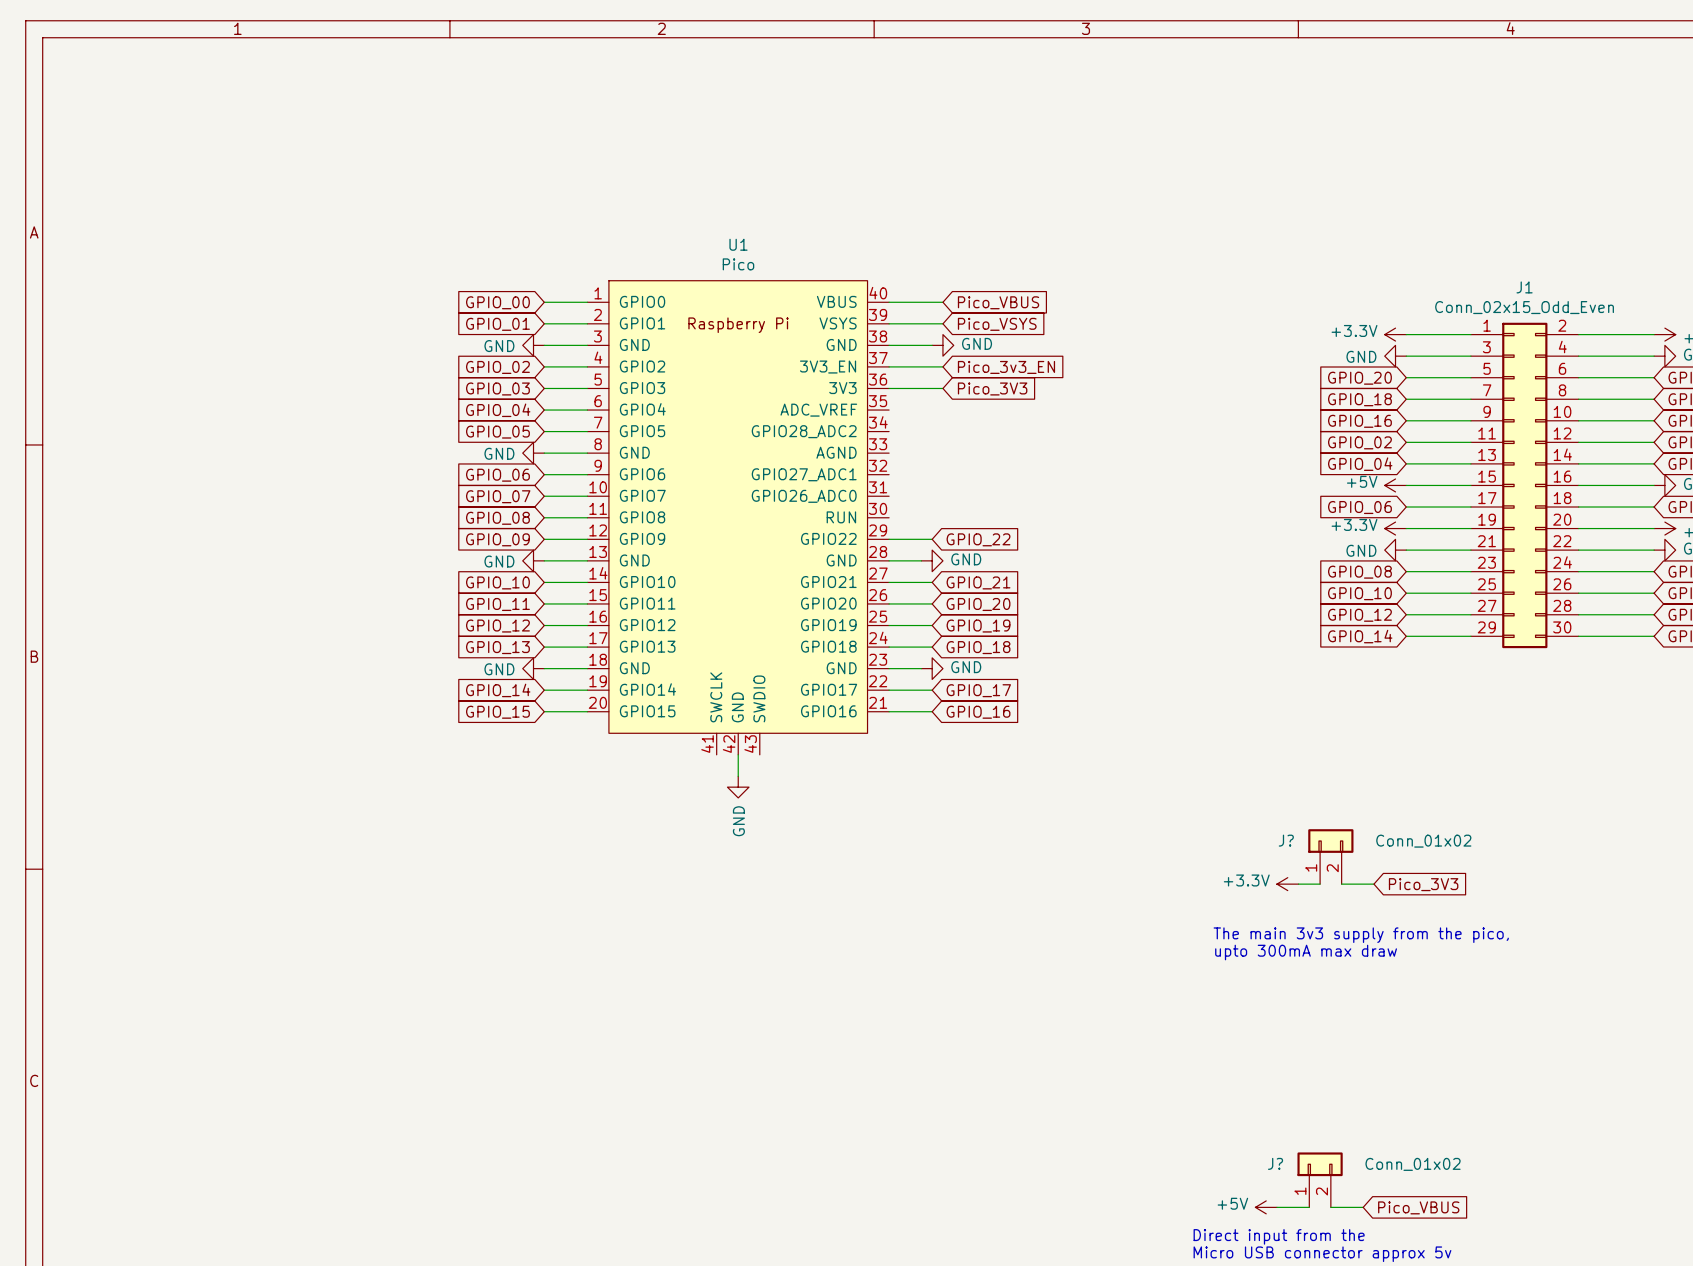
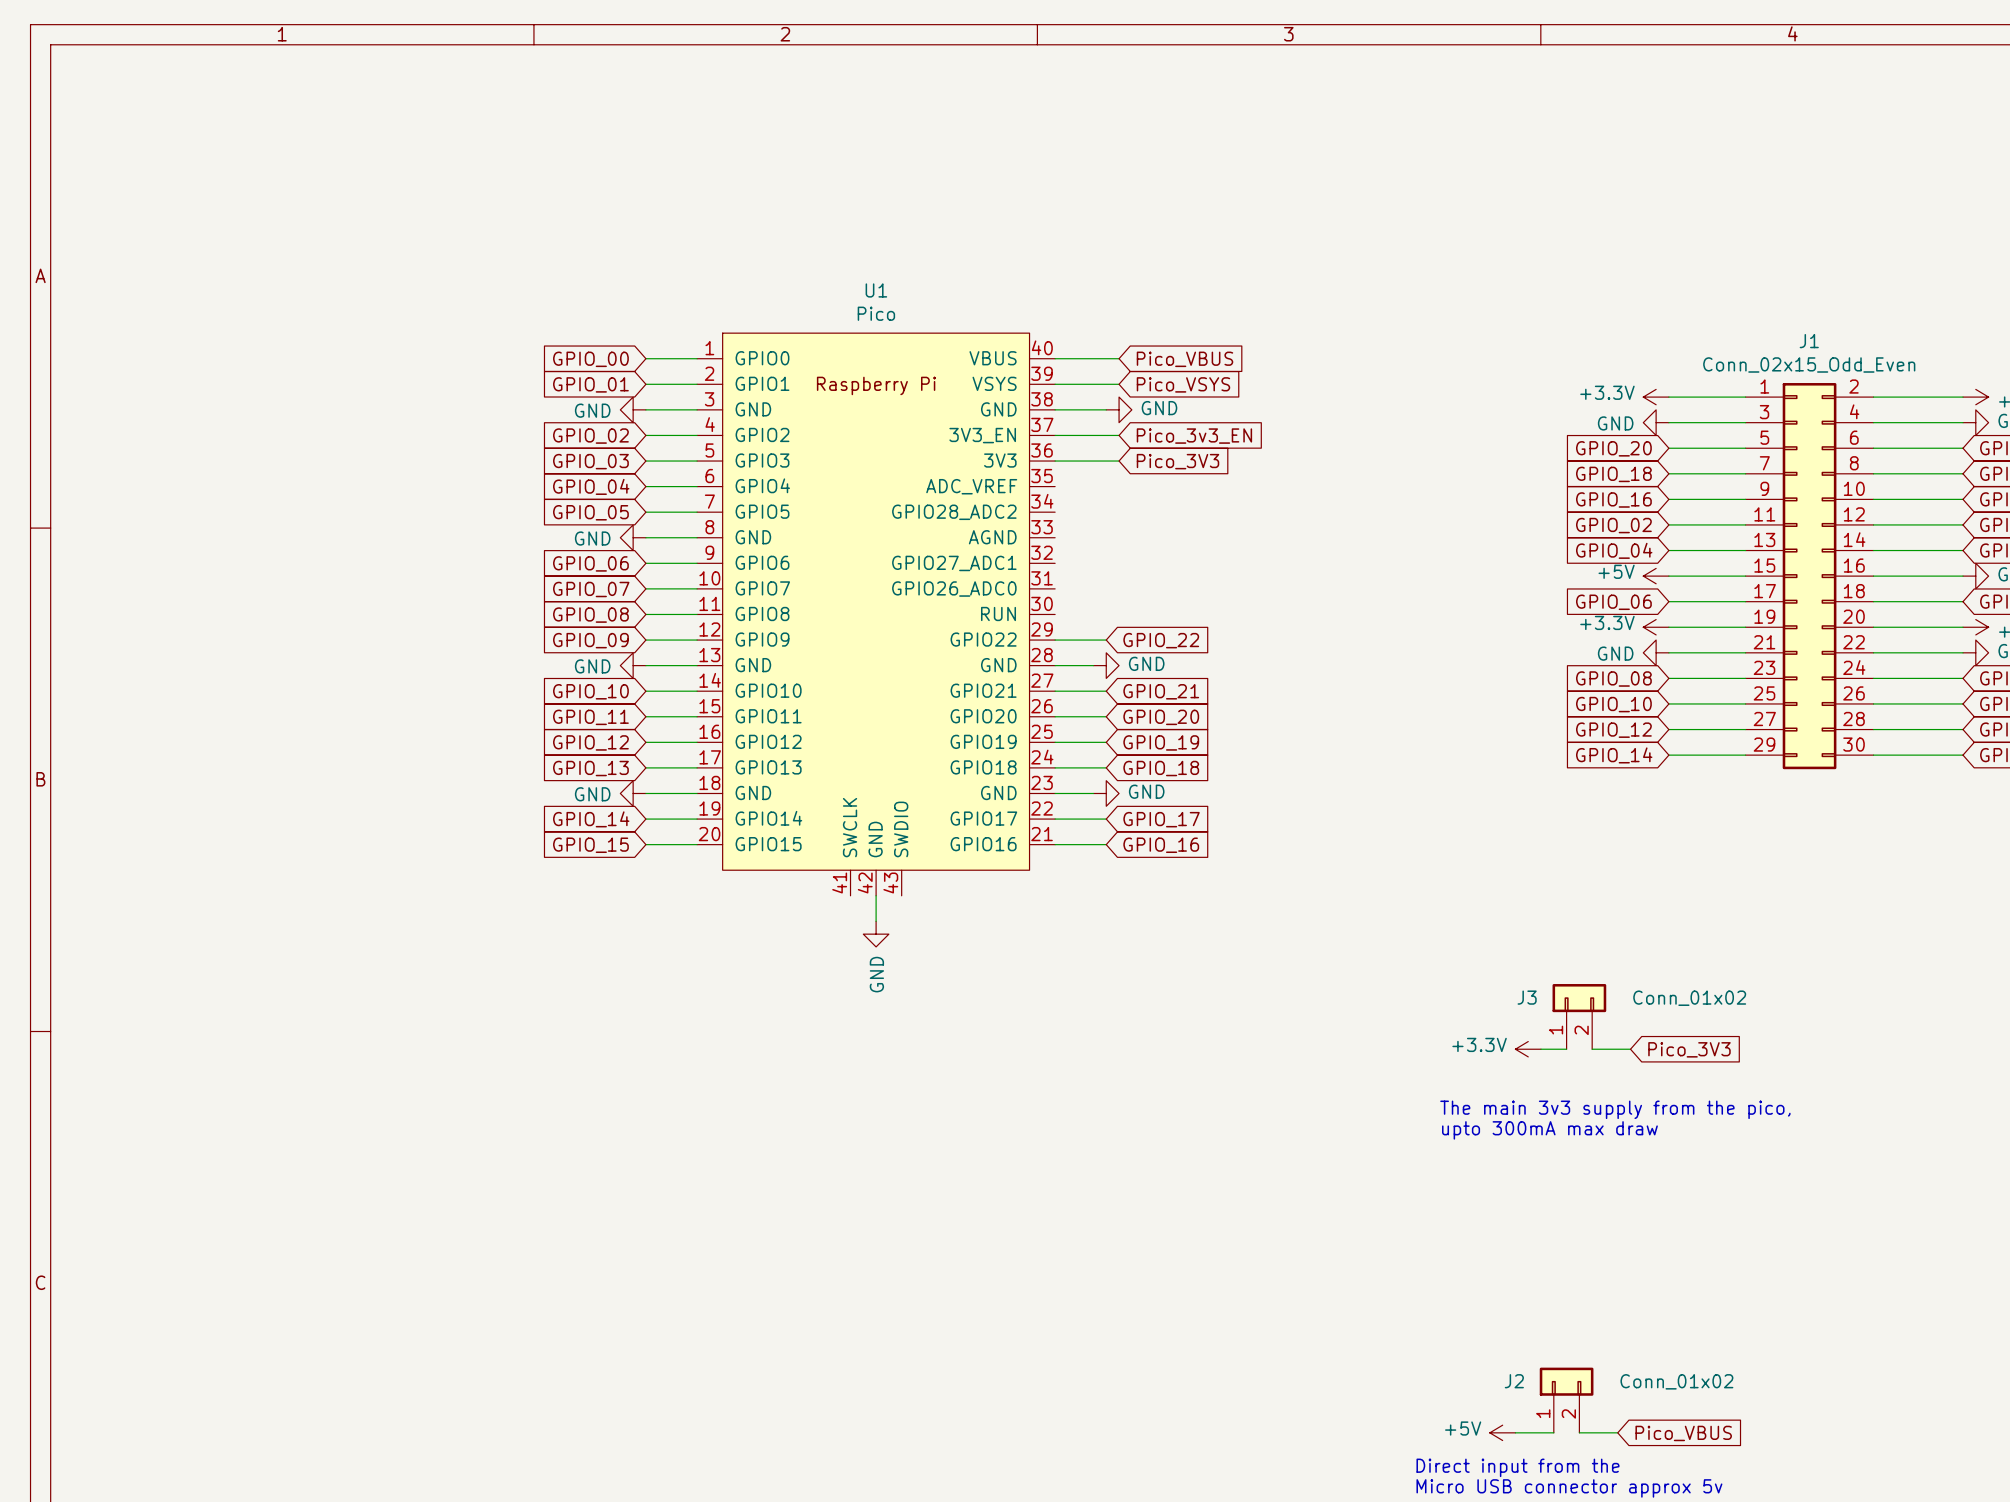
J? name: J? (1286, 840) -> J3 (1527, 997)
J? name: J? (1275, 1163) -> J2 (1514, 1381)

